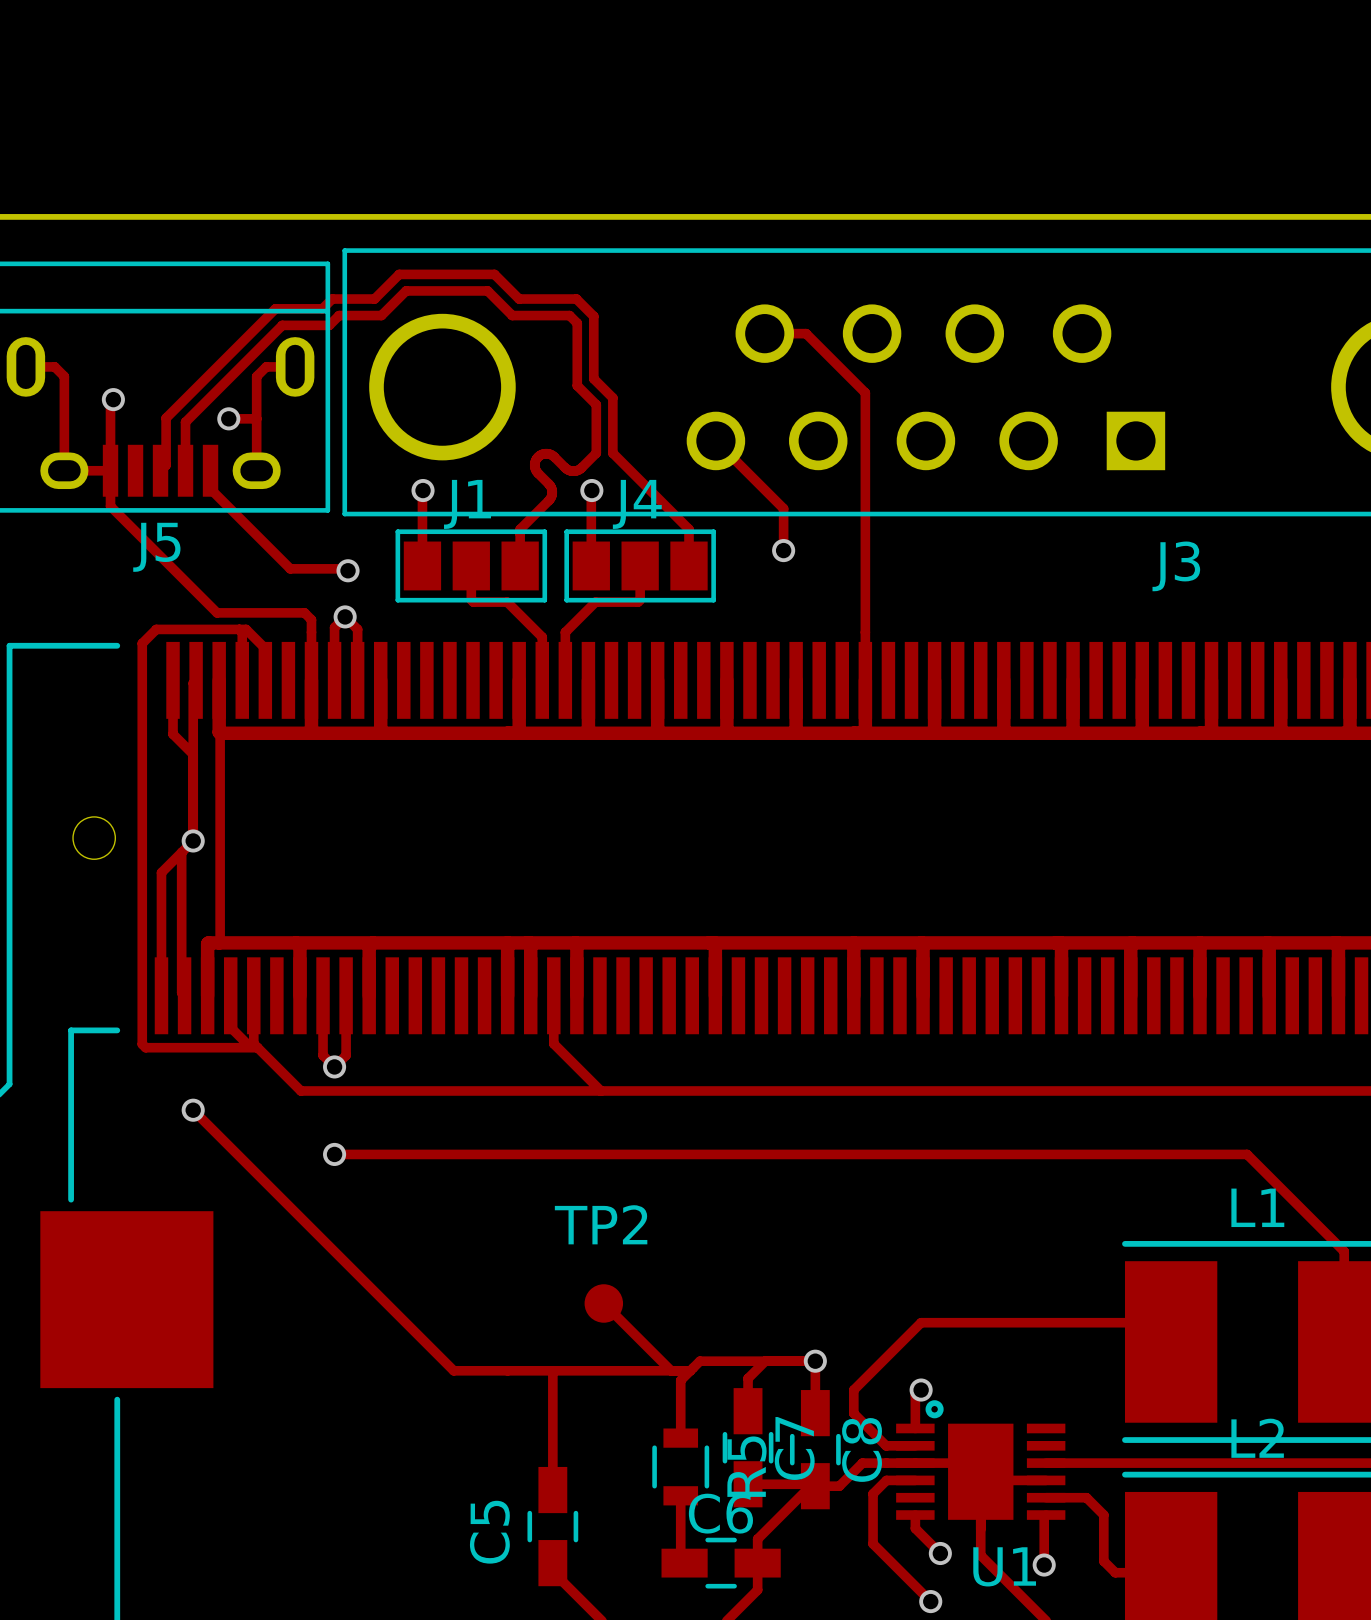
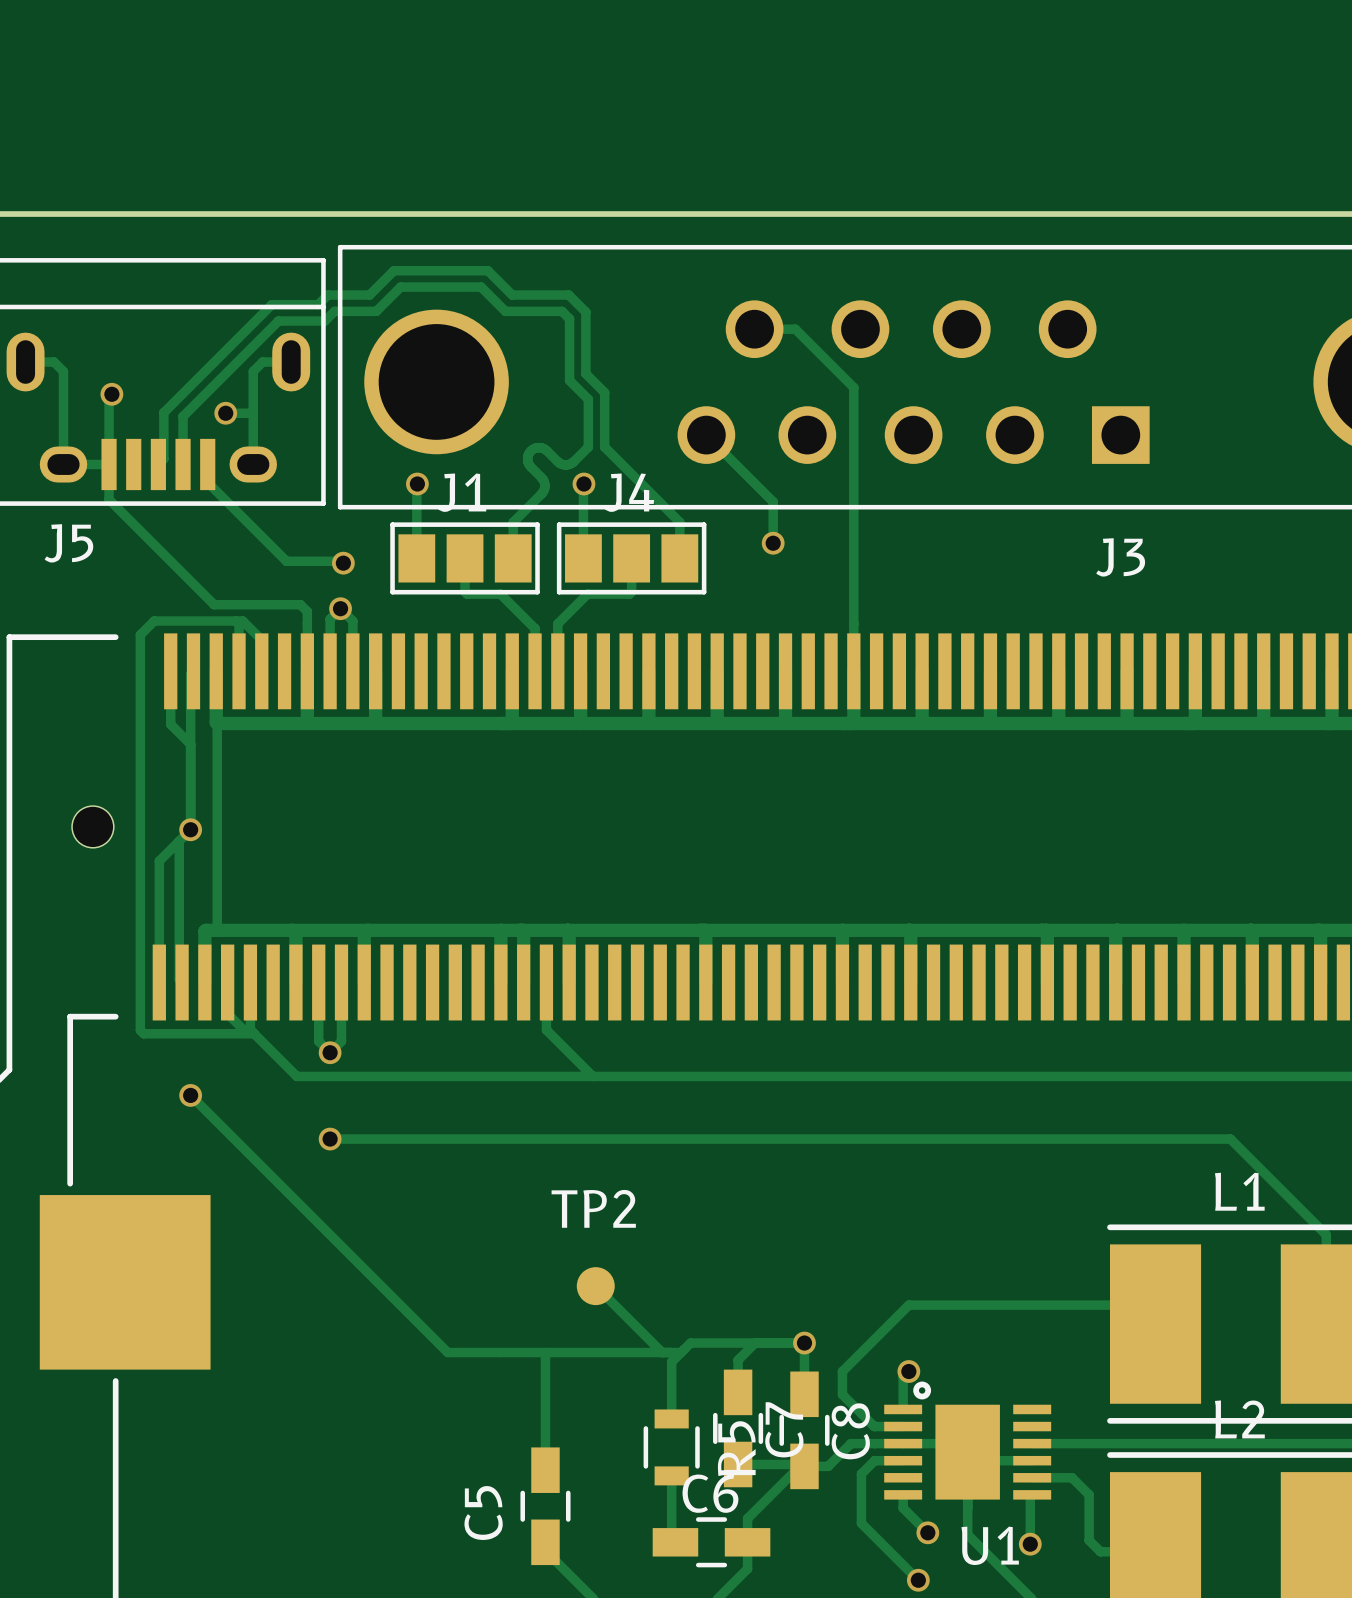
J5 name position: J5 (156, 547) -> J5 (68, 543)
J3 name position: J3 (1176, 566) -> J3 (1120, 557)

